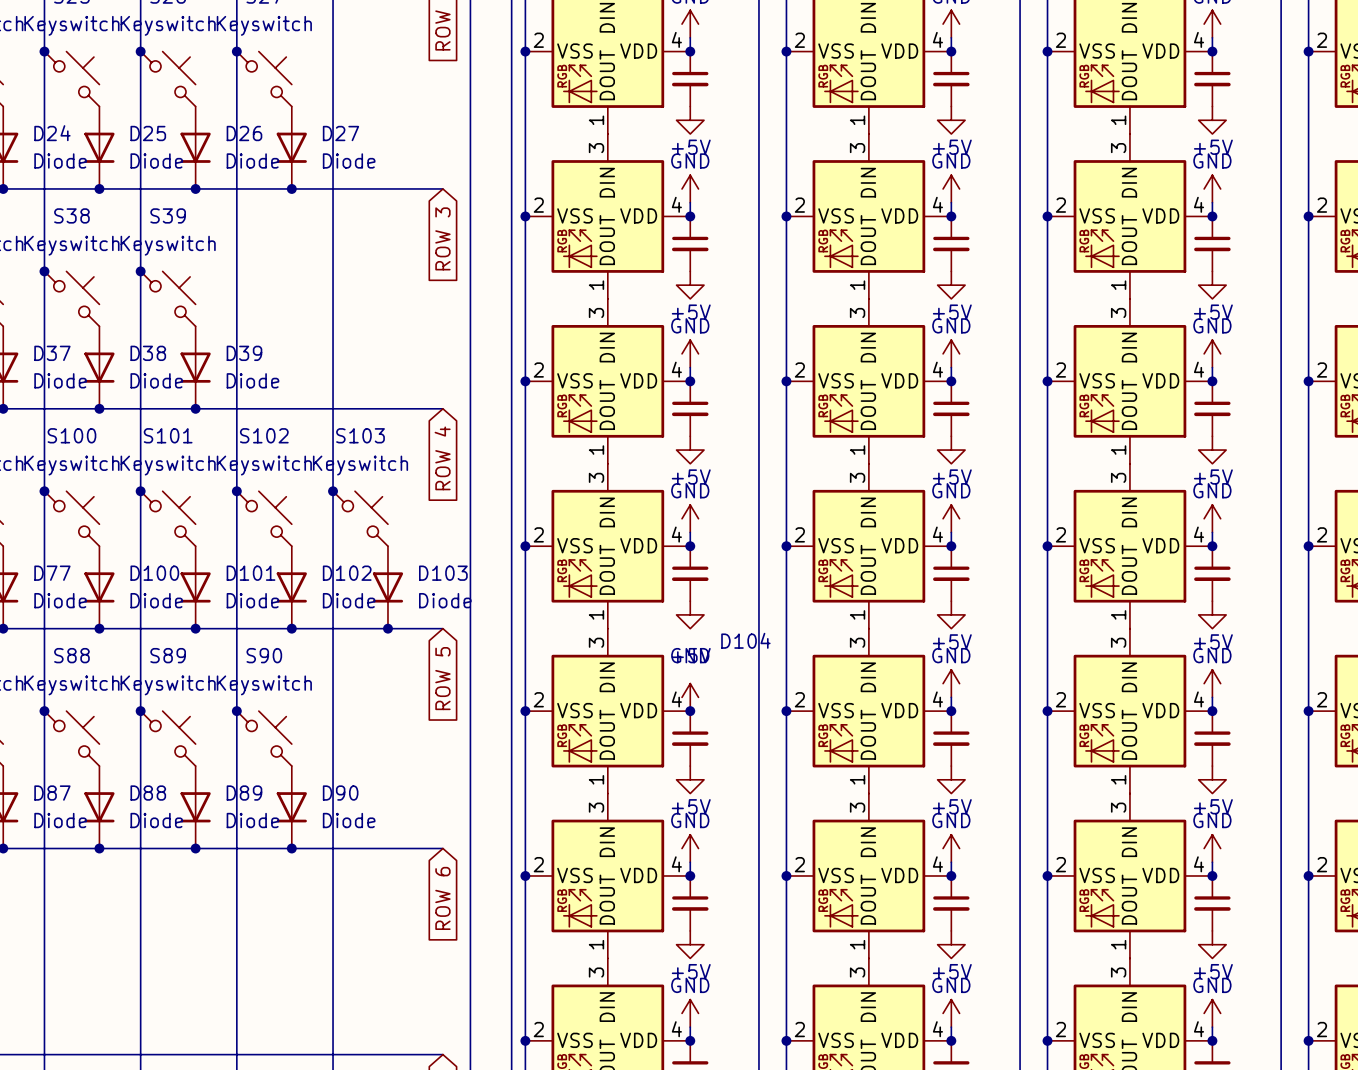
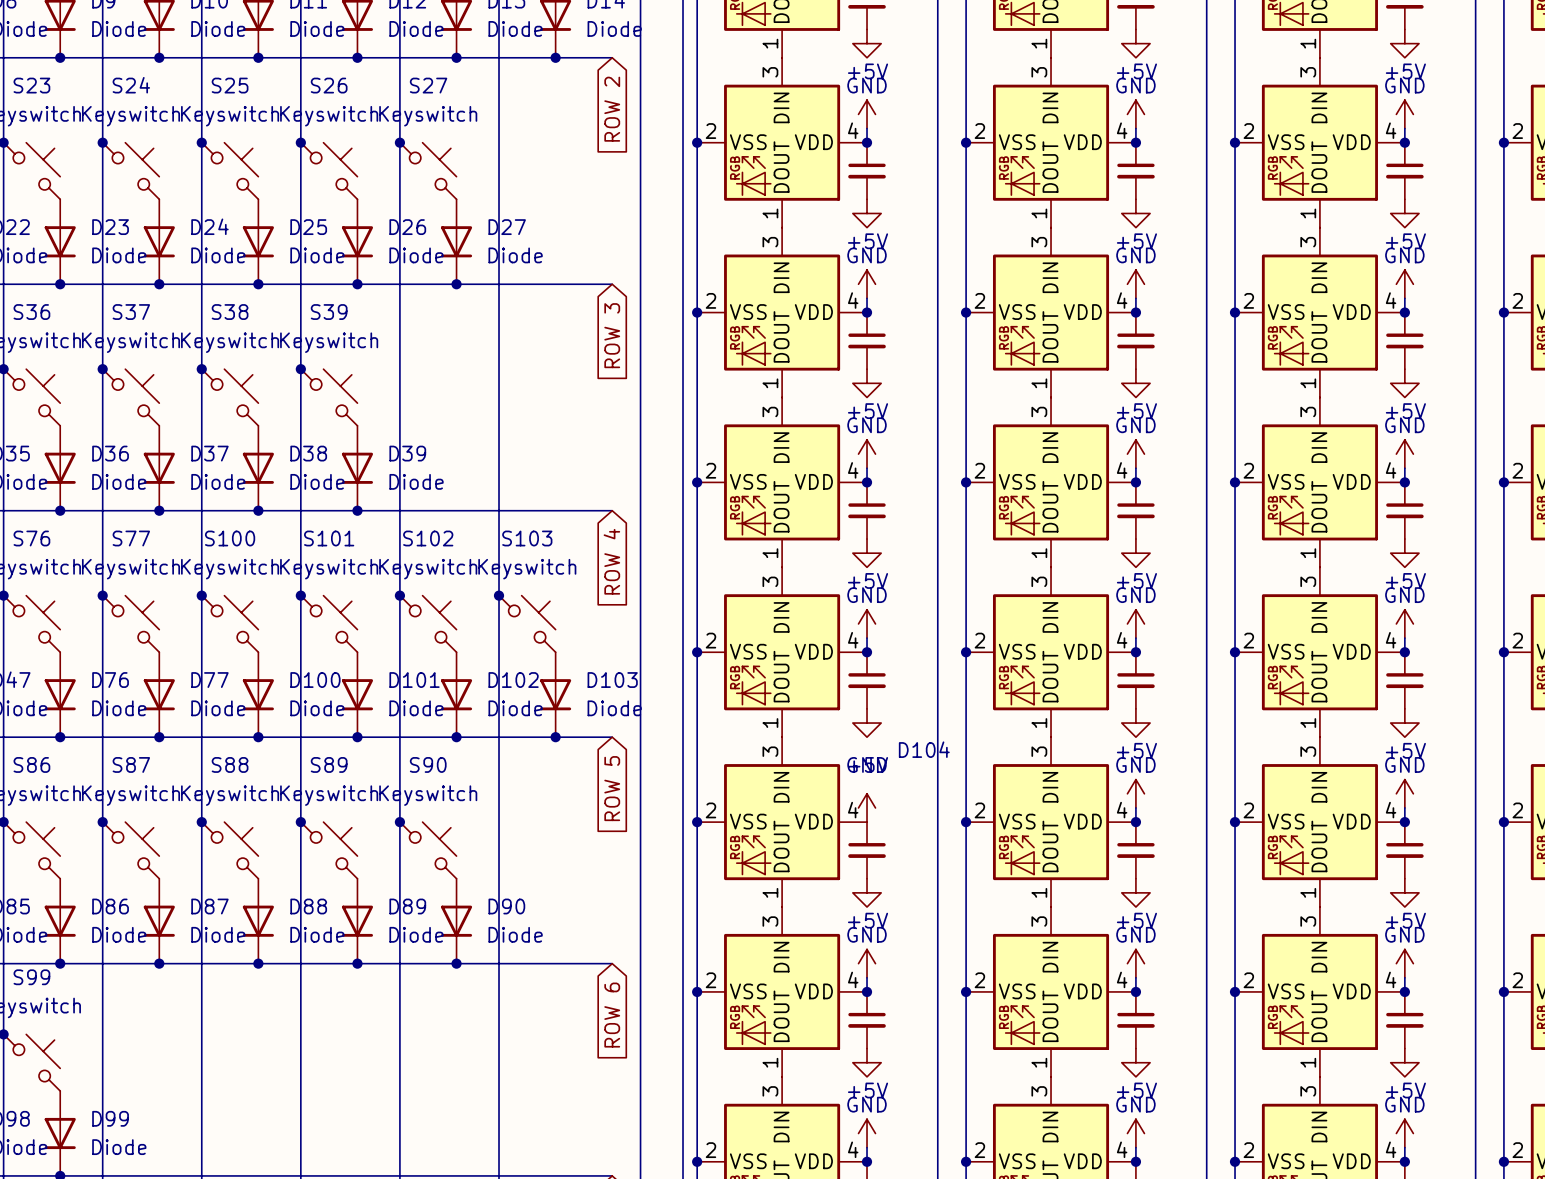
junction: (690, 711) -> none

